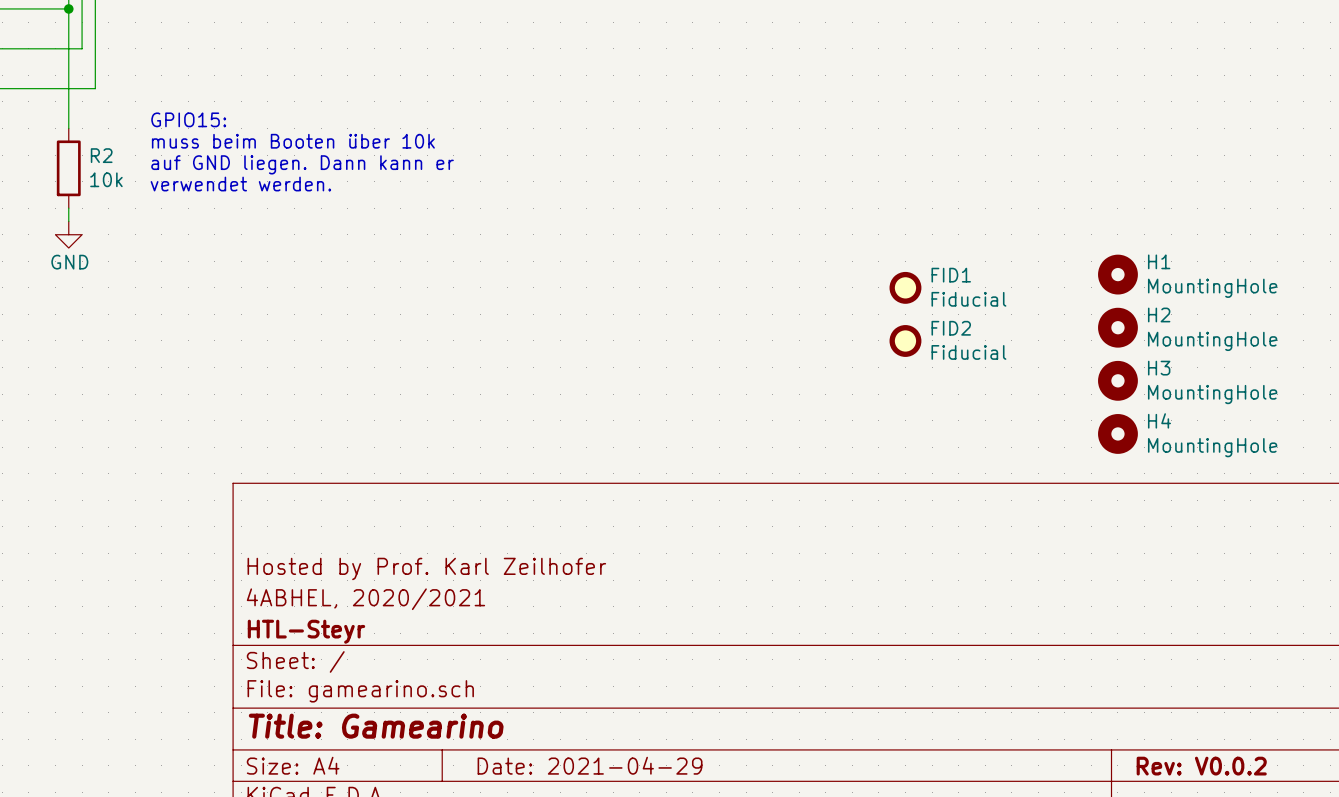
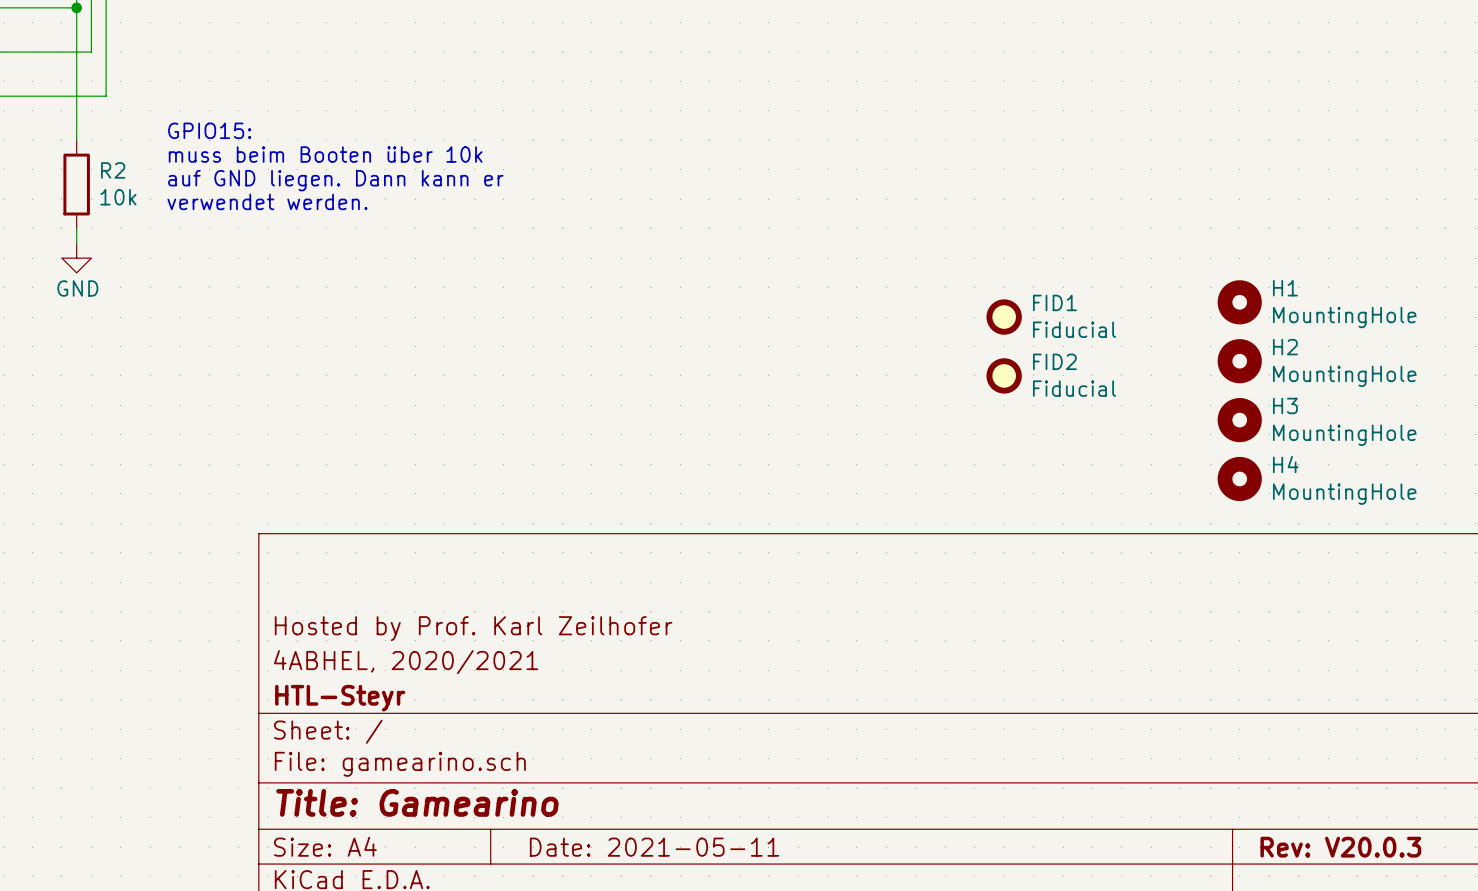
title block: Date: 2021-04-29 (590, 765) -> Date: 2021-05-11 (654, 847)
title block: Rev: V0.0.2 (1201, 766) -> Rev: V20.0.3 (1340, 847)

